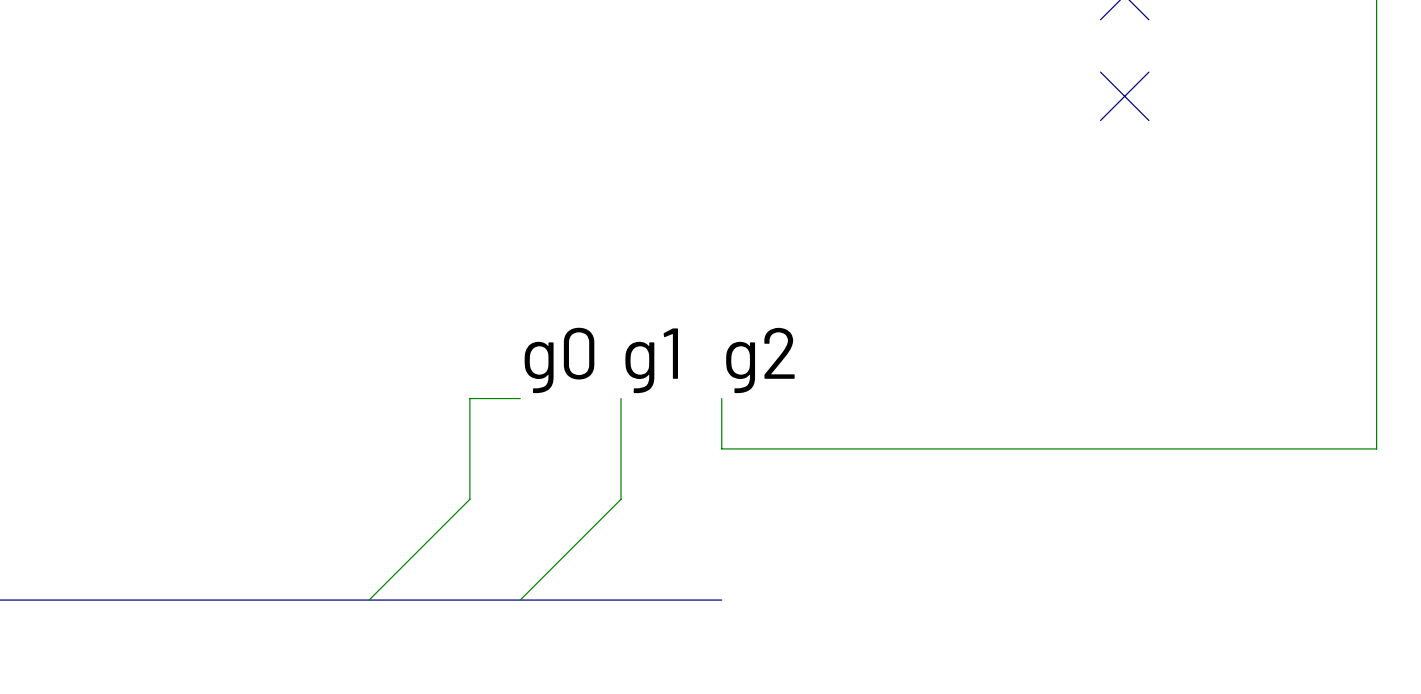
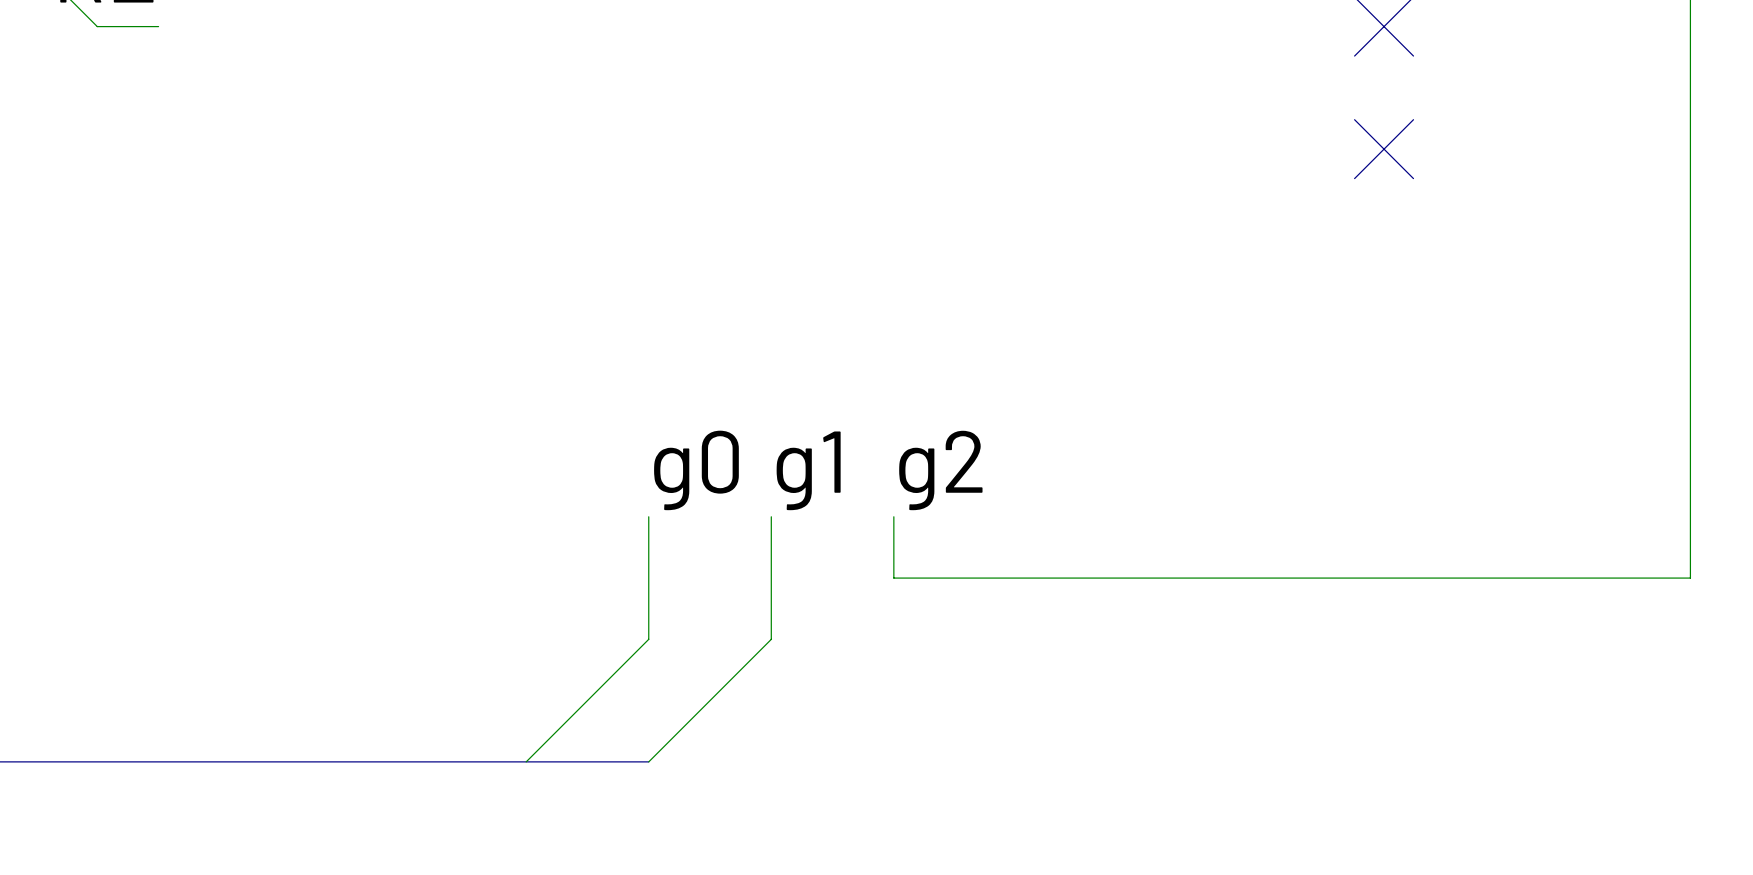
wire: (520, 398) (469, 398) (469, 499) (369, 600) -> (648, 516) (648, 639) (526, 761)
bus: (520, 600) (721, 600) -> none

